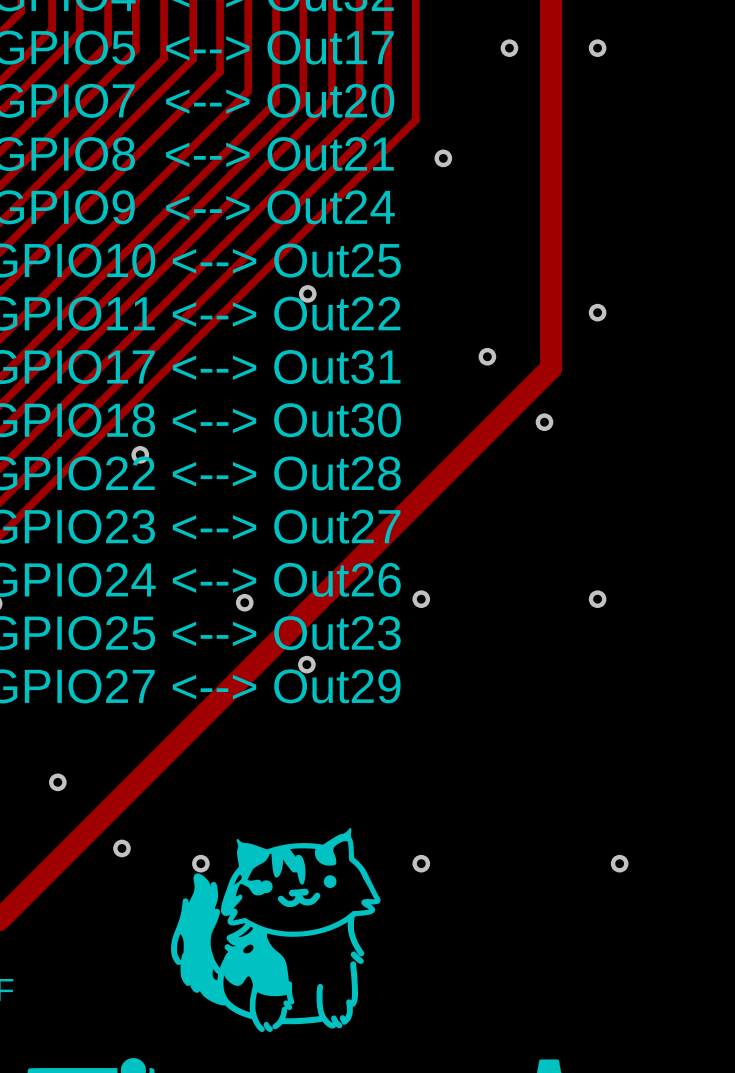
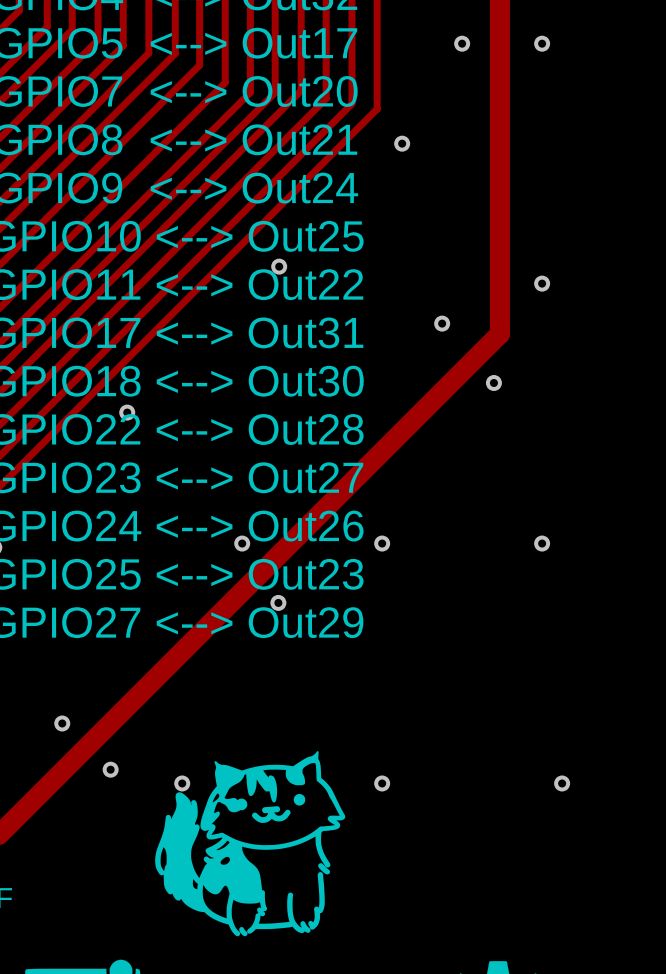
via position: (244, 602) -> (242, 543)
via position: (57, 782) -> (62, 723)

